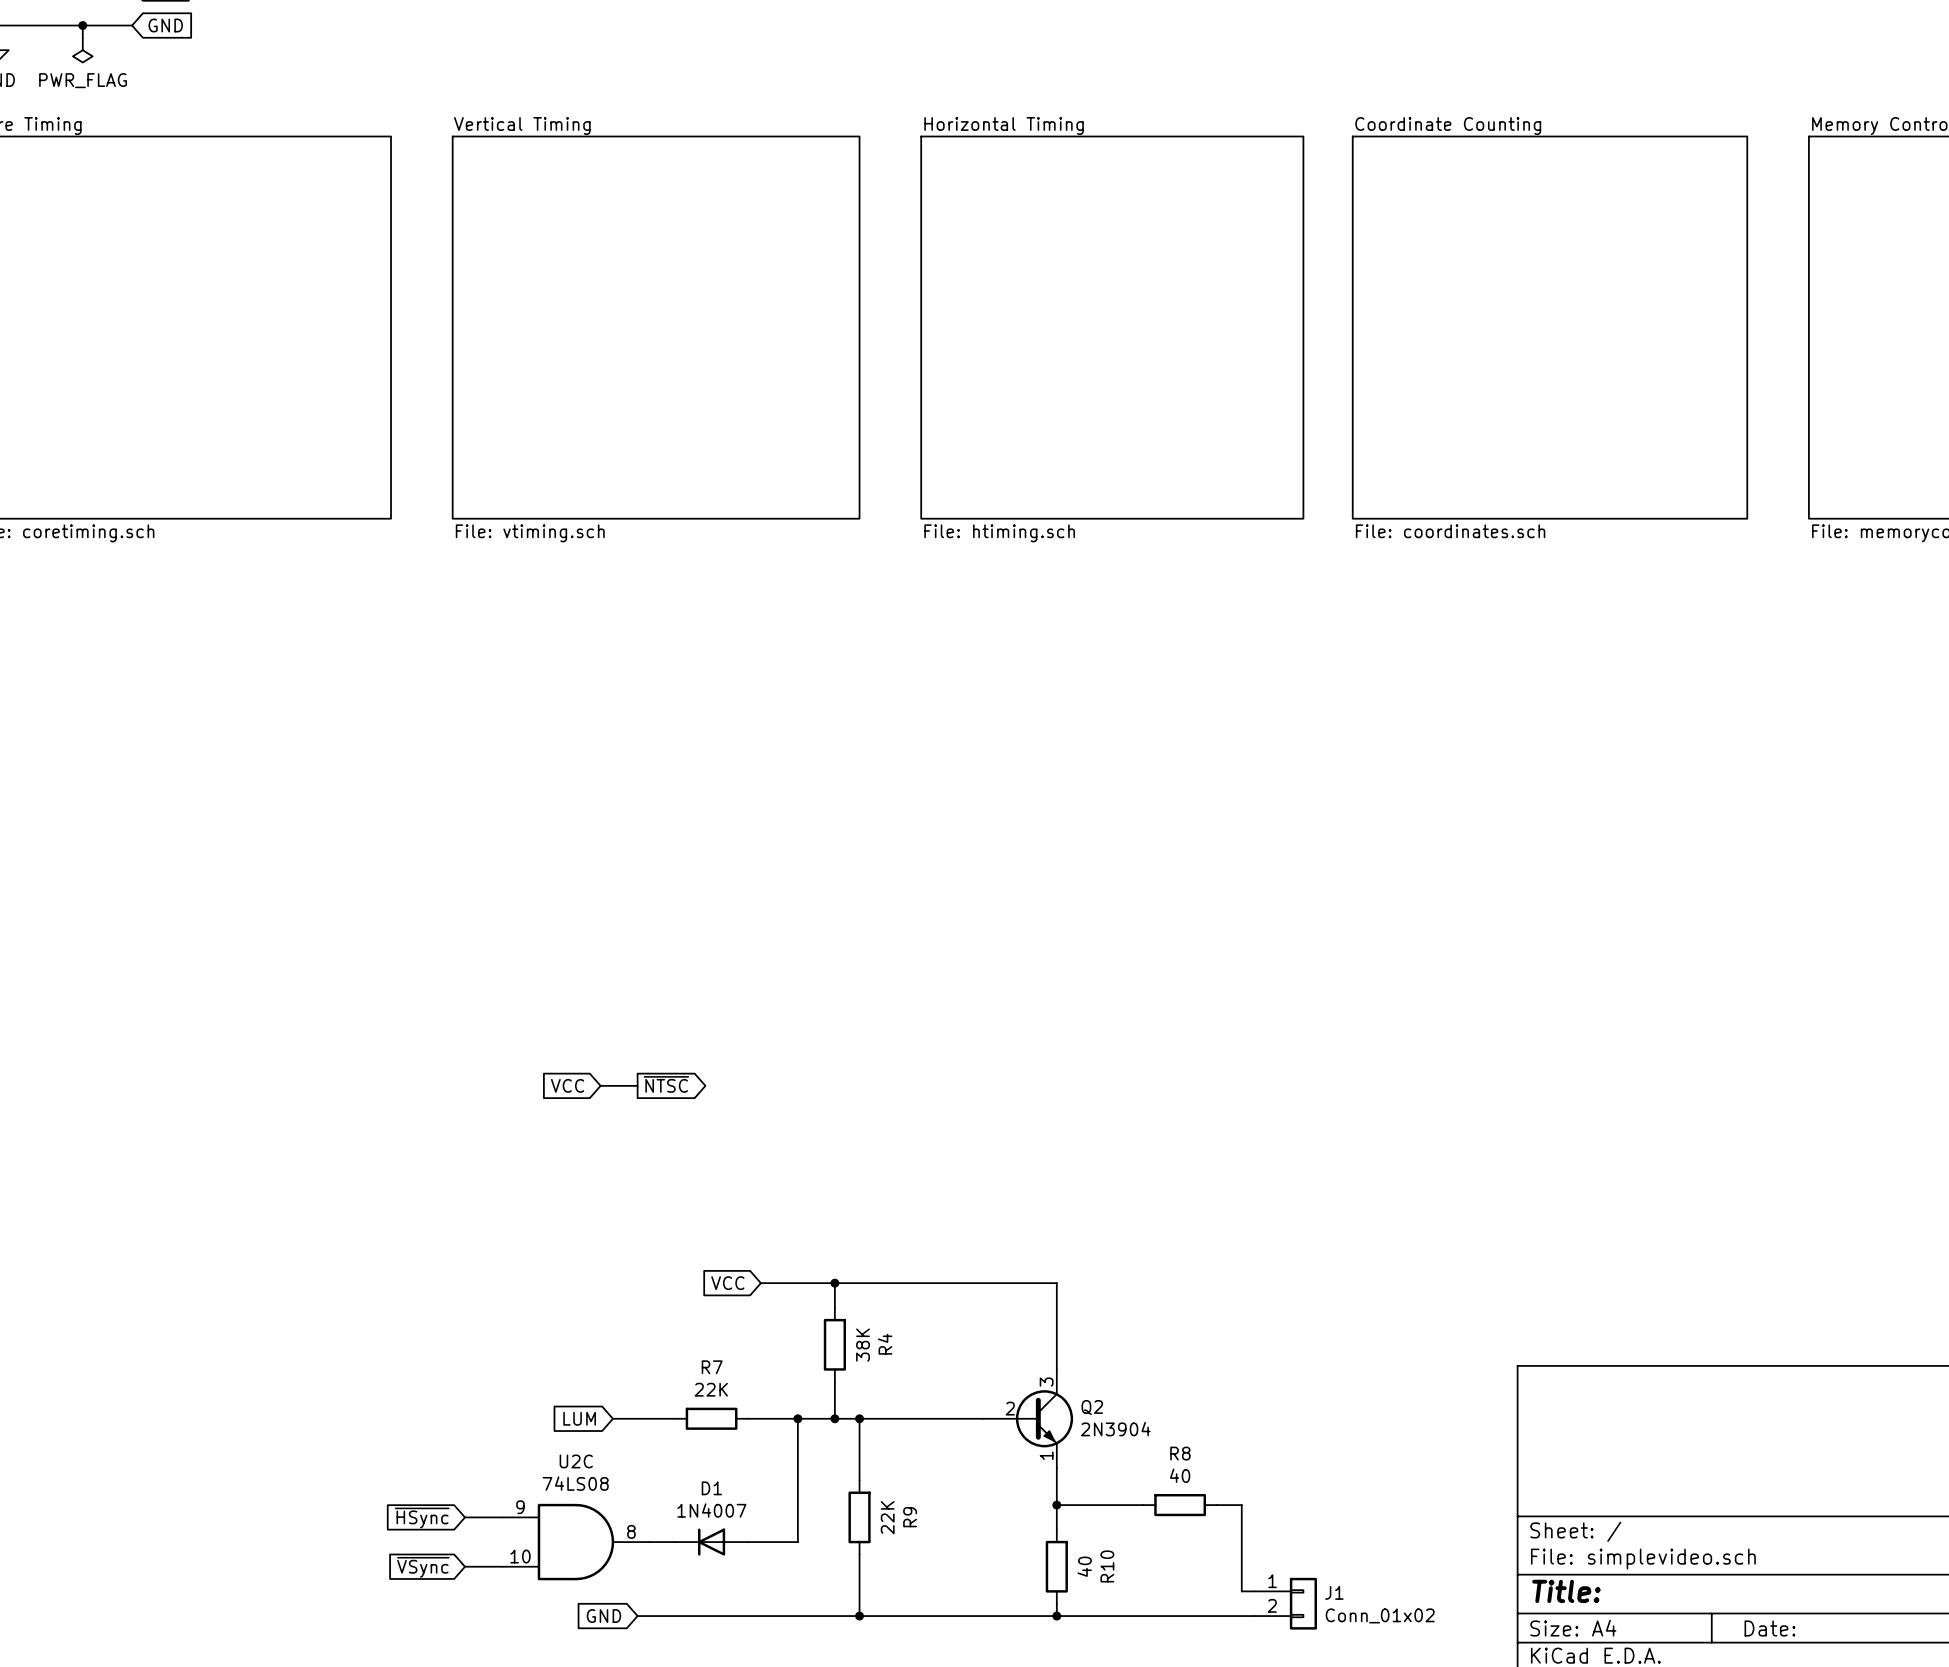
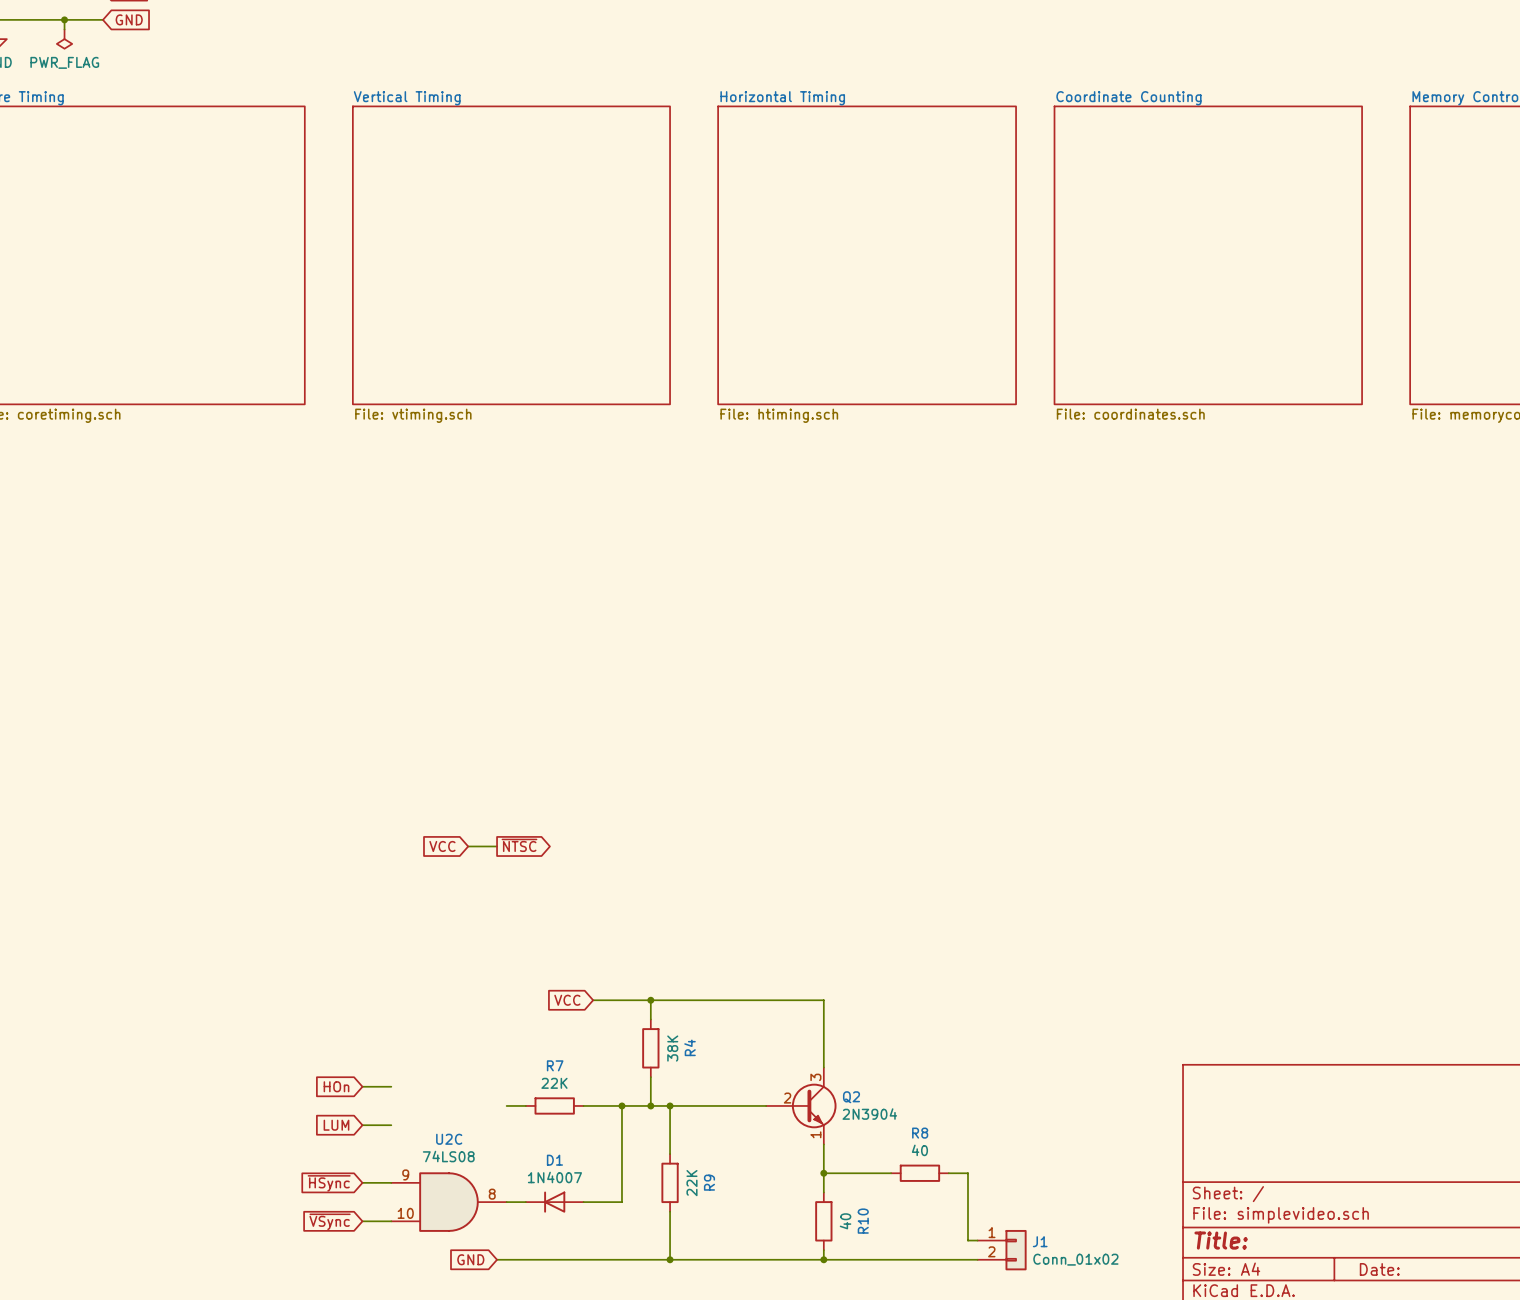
global label: none -> HOn (336, 1086)
global label position: LUM (579, 1418) -> LUM (336, 1125)
wire: (612, 1418) (649, 1418) -> (362, 1086) (391, 1086)
wire: none -> (362, 1125) (391, 1125)

